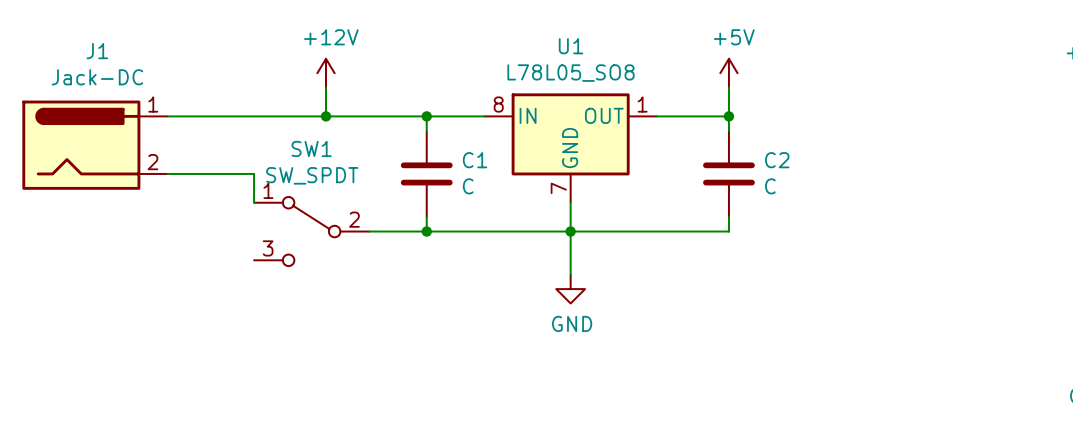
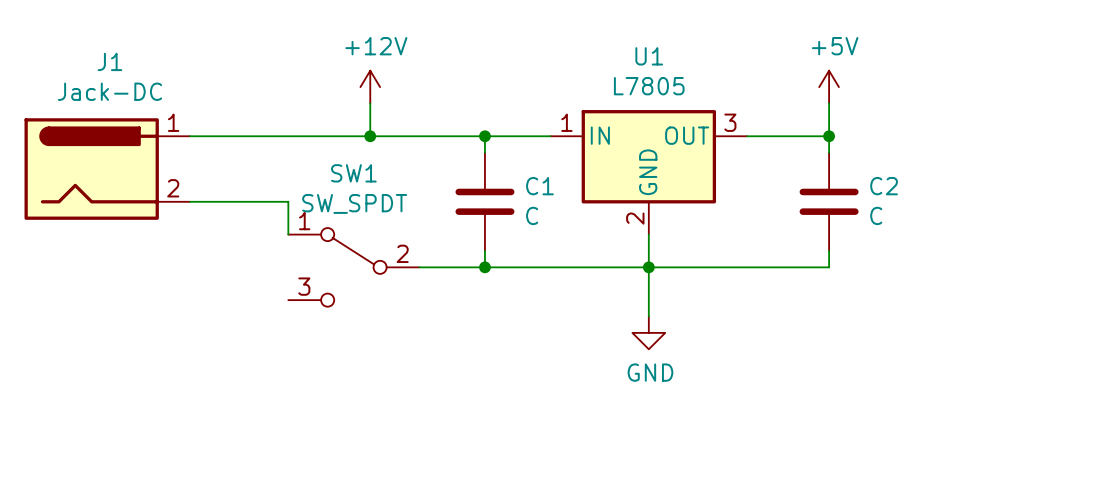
U1 value: L78L05_SO8 (571, 73) -> L7805 (649, 86)
U1 pin number: 8 (498, 104) -> 1 (566, 122)
U1 pin number: 1 (642, 104) -> 3 (730, 122)
U1 pin number: 7 (558, 188) -> 2 (635, 218)

